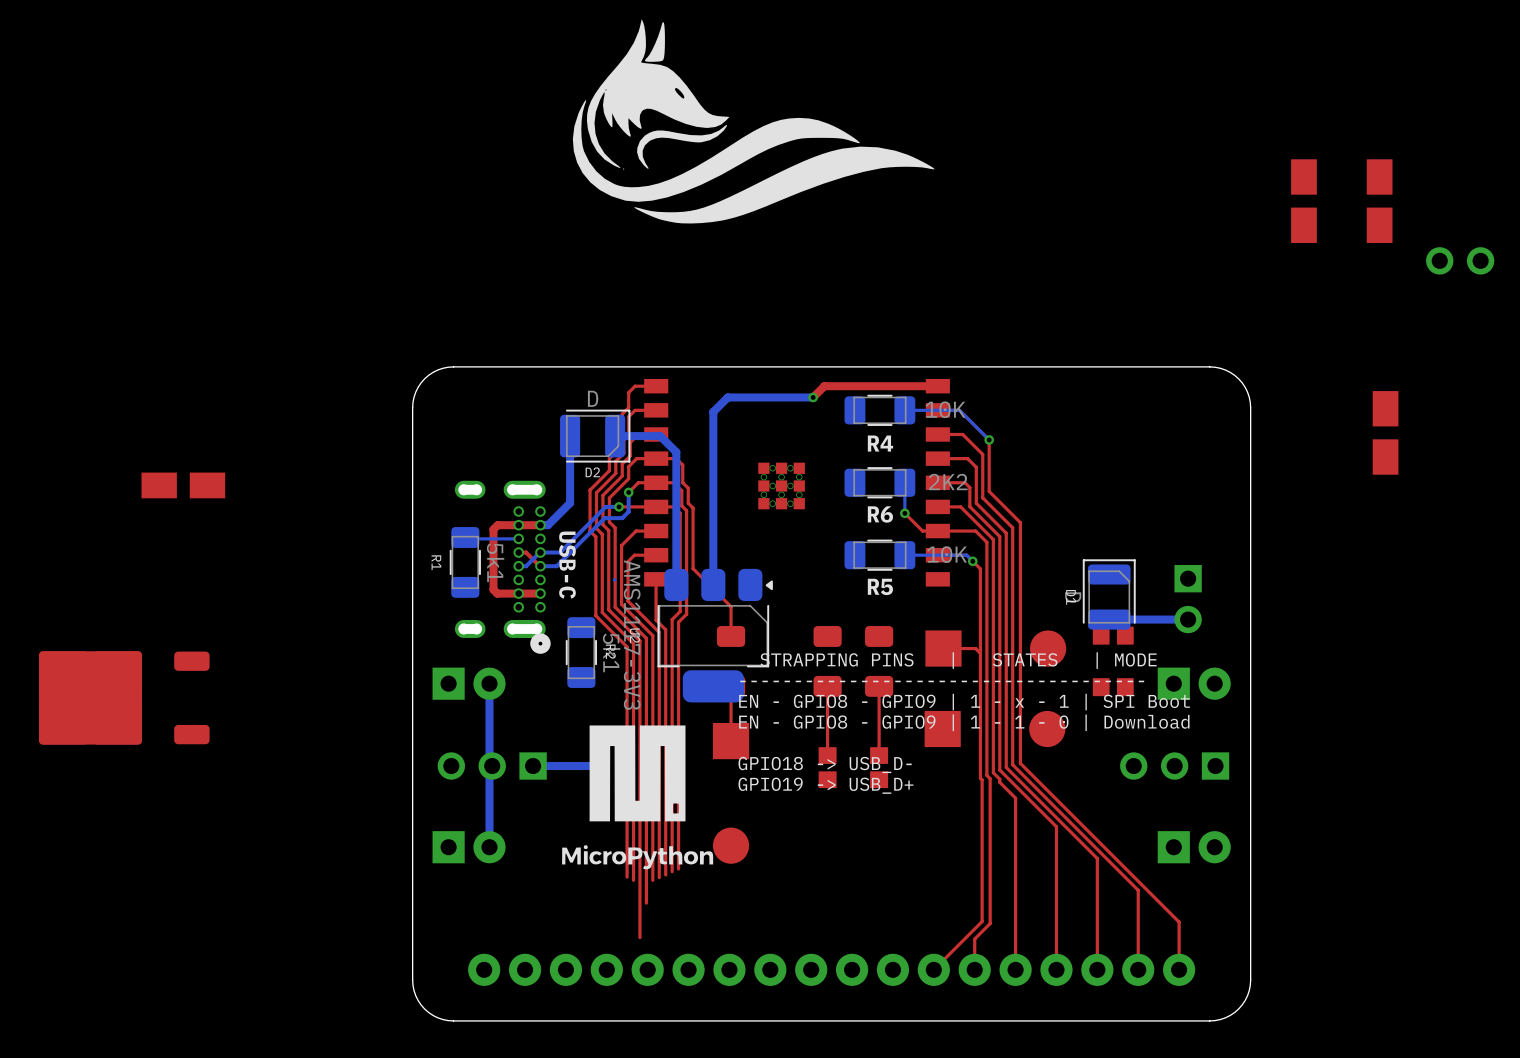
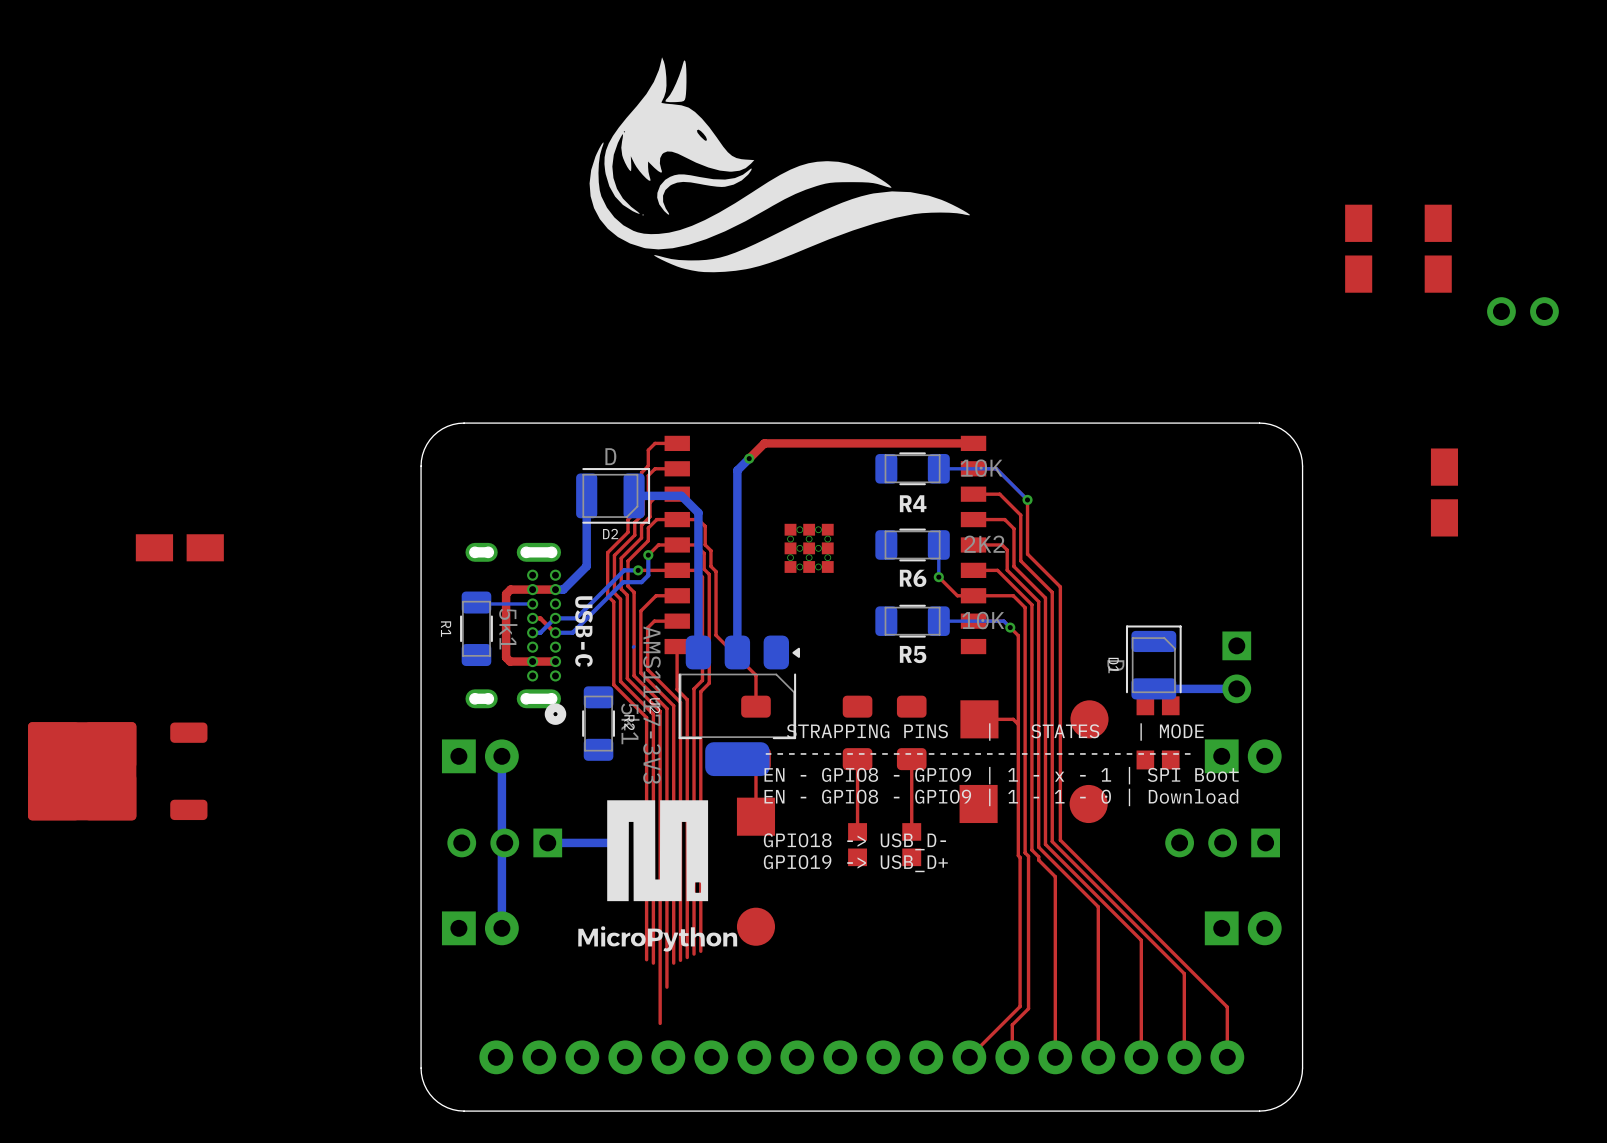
top track: (824, 386) (813, 397) -> (854, 443) (764, 443) (749, 458)
bottom track: (813, 397) (727, 397) (724, 400) -> none
via position: (813, 397) -> (749, 458)

